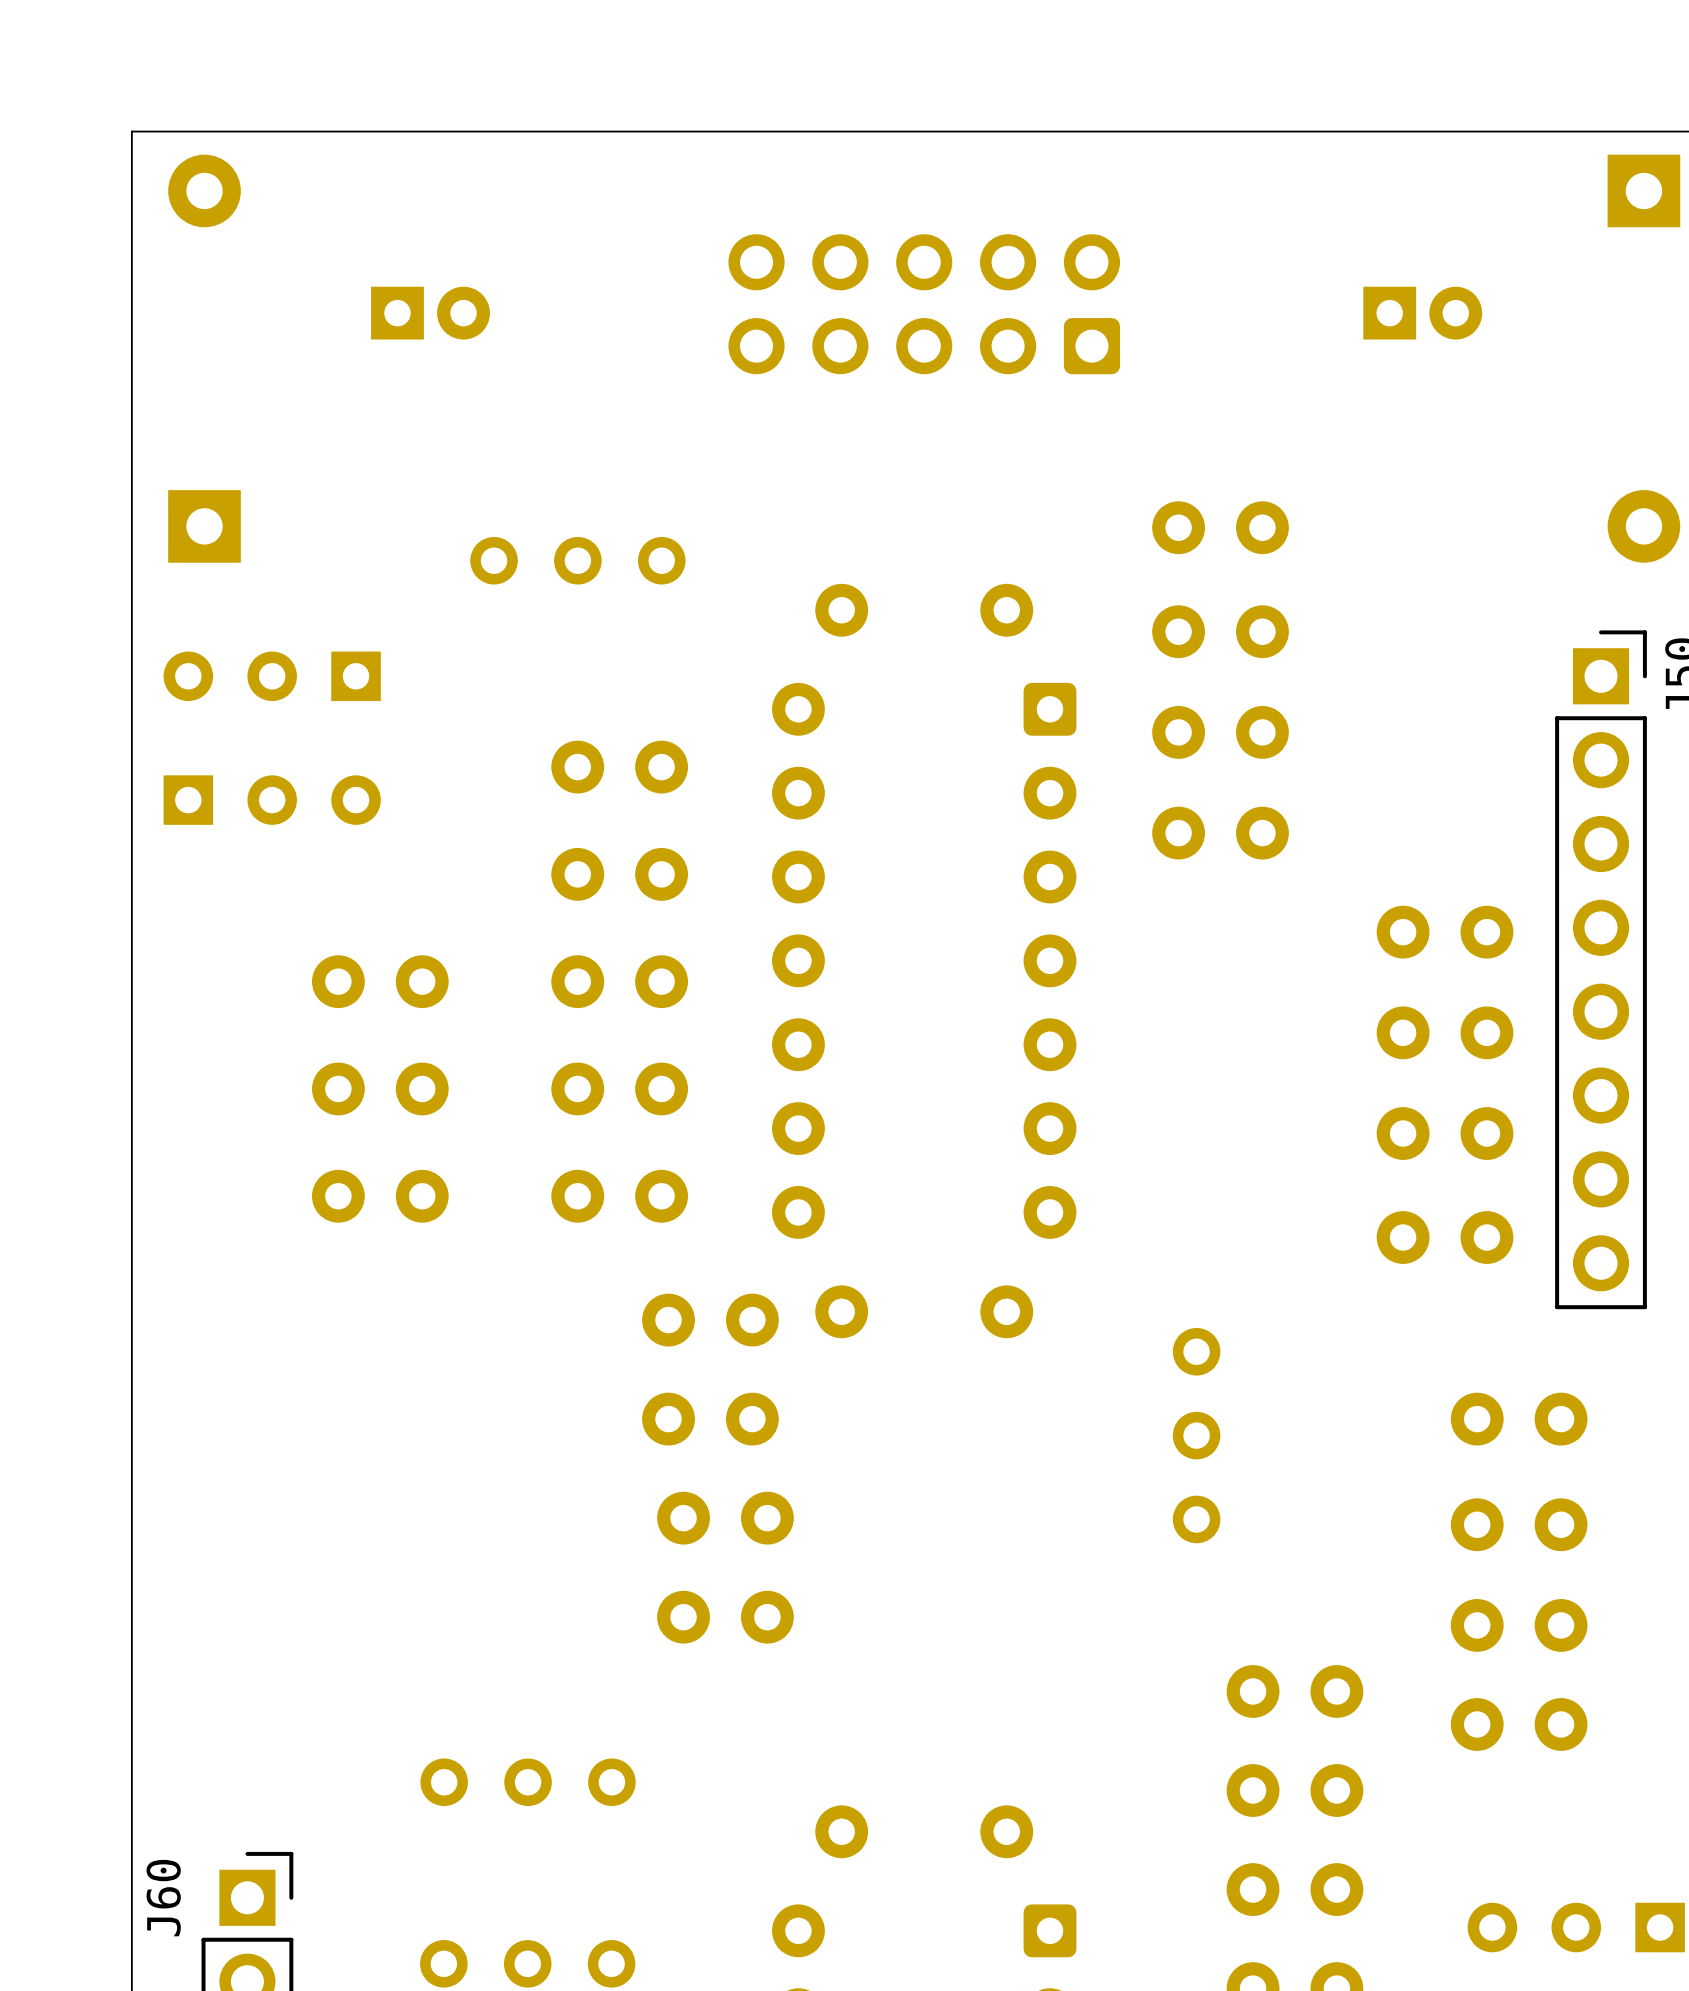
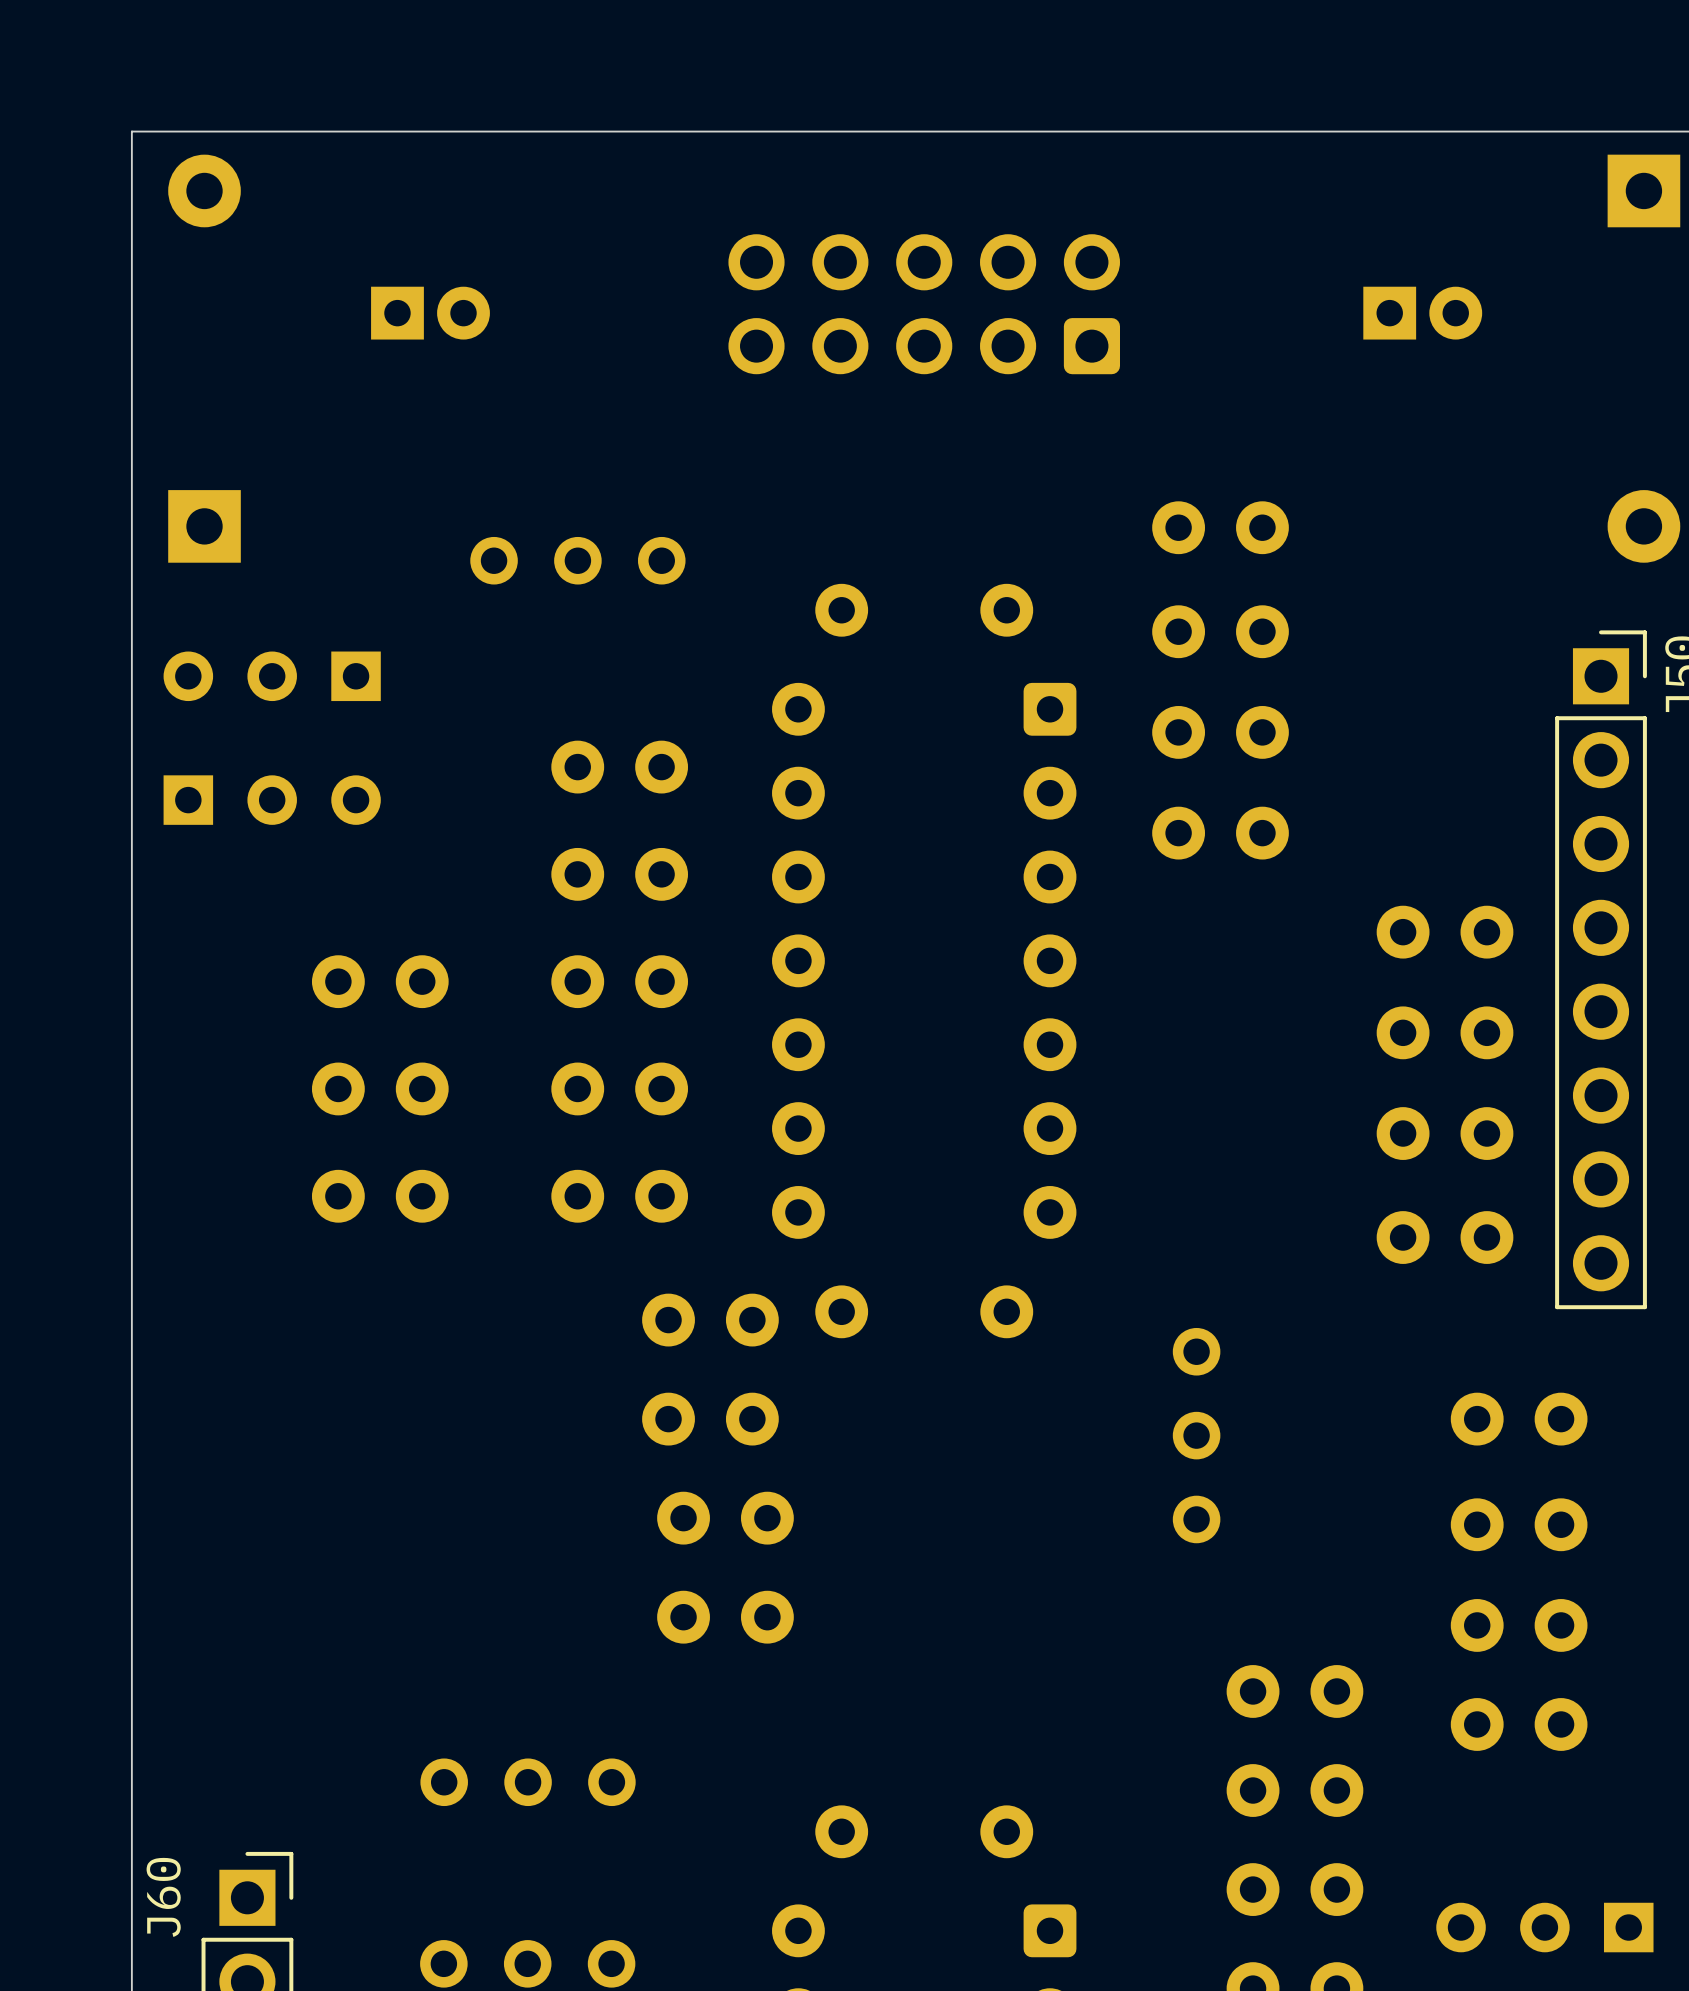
part position: (1576, 1927) -> (1544, 1927)

